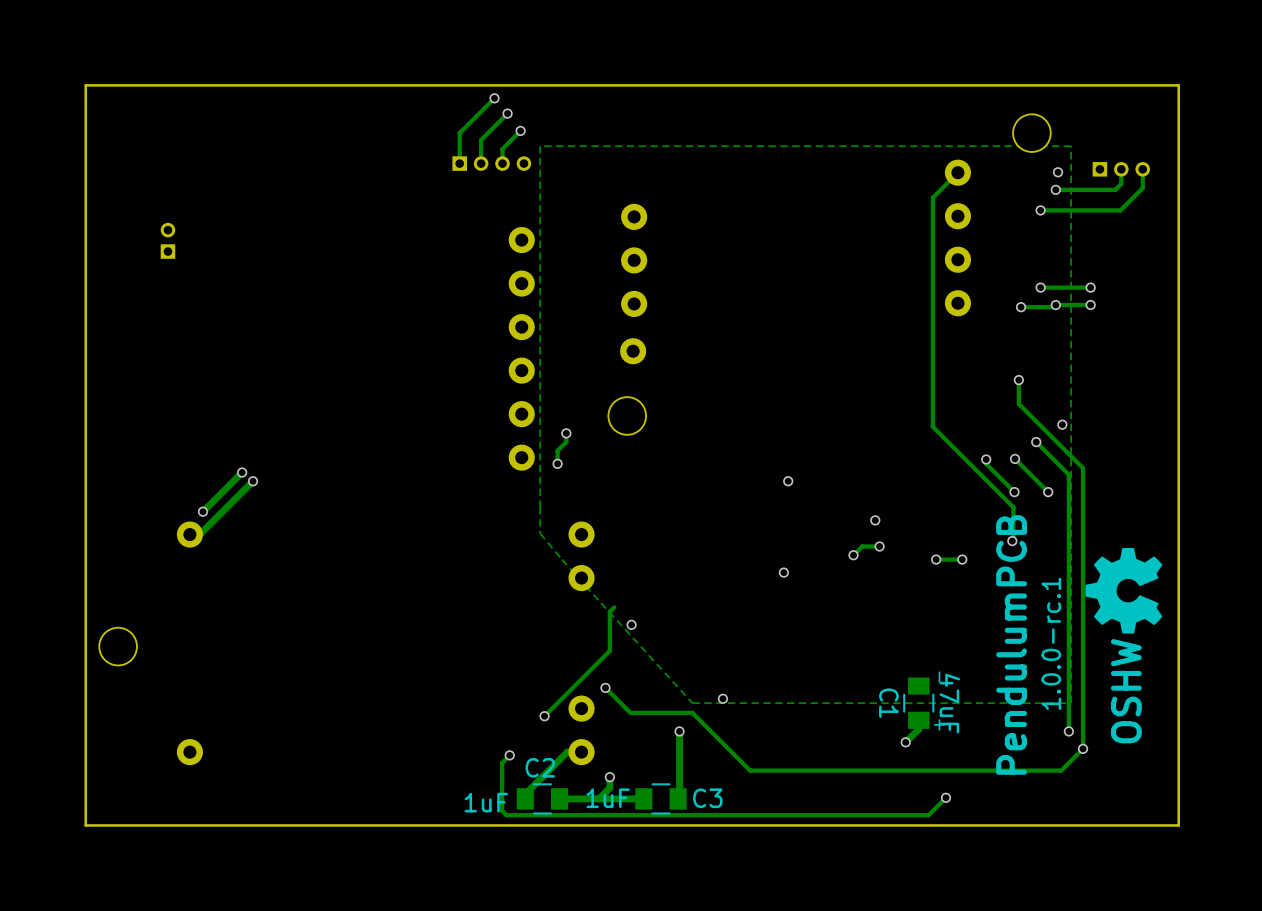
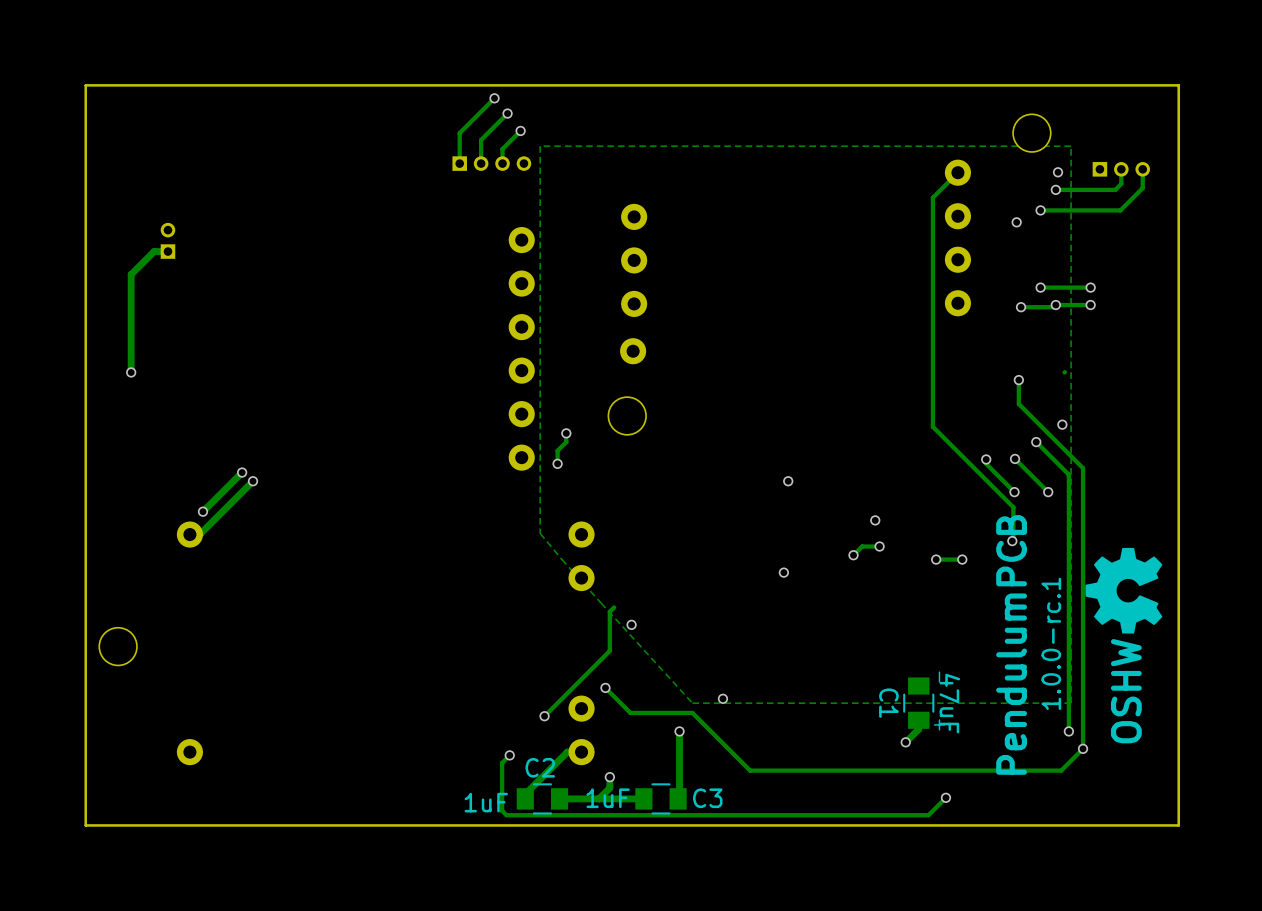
via: none -> (1016, 222)
track: none -> (167, 251) (154, 251) (131, 274) (131, 372)
via: none -> (131, 372)
track: none -> (1064, 372) (1064, 372)

